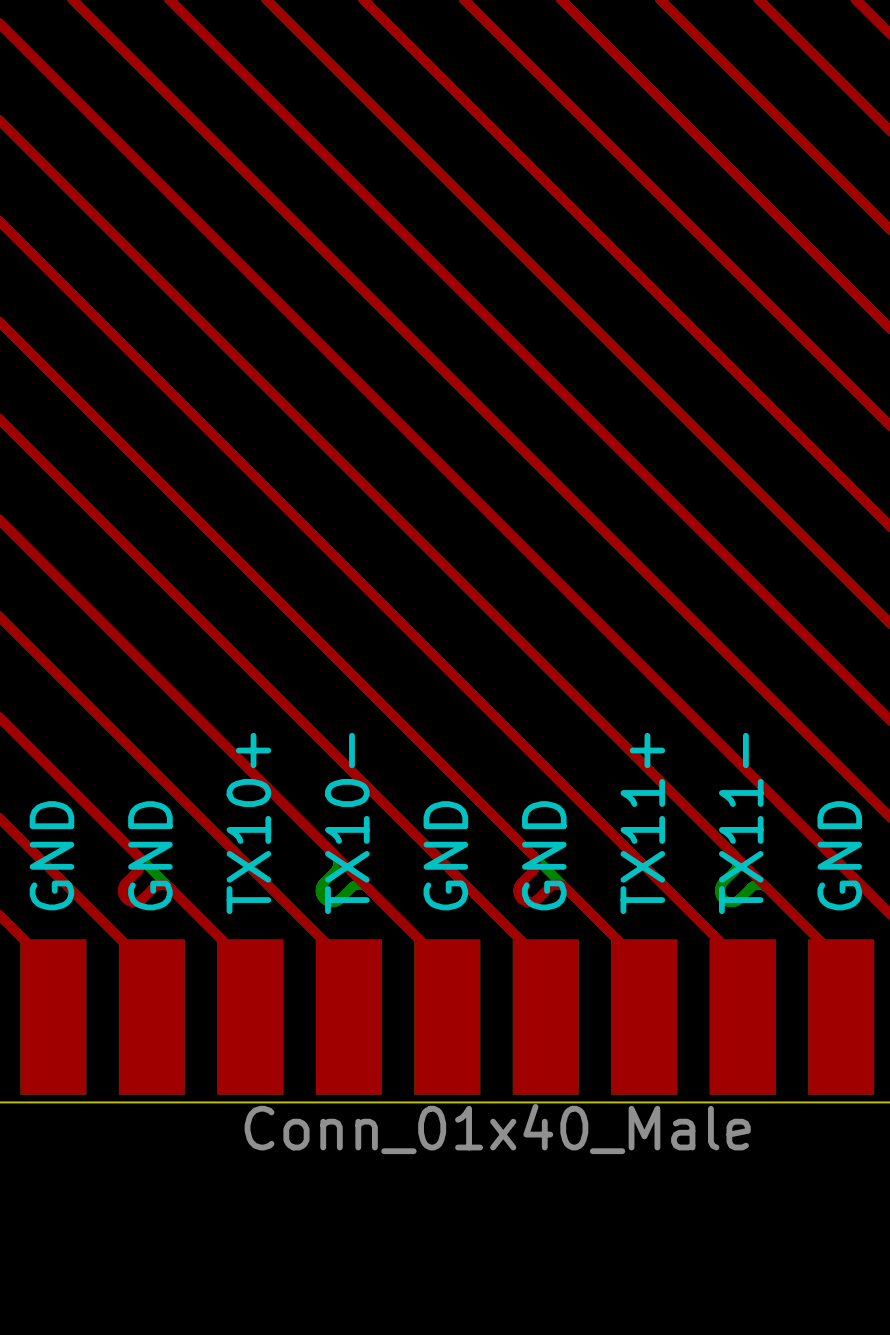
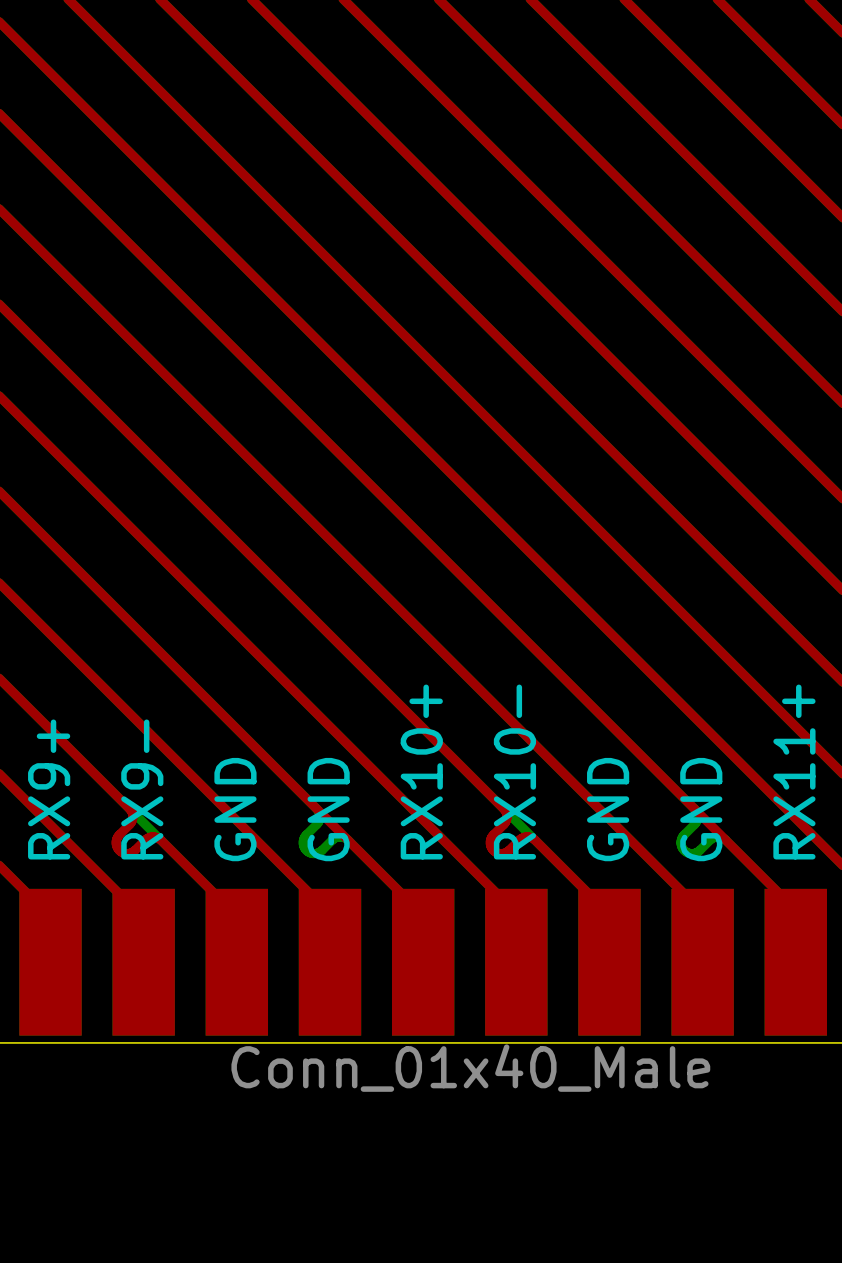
text: TX10+ (248, 823) -> GND (235, 809)
text: TX10- (347, 823) -> GND (328, 809)
text: TX11+ (642, 823) -> GND (608, 809)
text: TX11- (741, 823) -> GND (701, 809)
text: GND (51, 855) -> RX9+ (49, 789)
text: GND (150, 855) -> RX9- (142, 789)
text: GND (445, 855) -> RX10+ (421, 772)
text: GND (544, 855) -> RX10- (514, 772)
text: GND (839, 855) -> RX11+ (794, 772)

